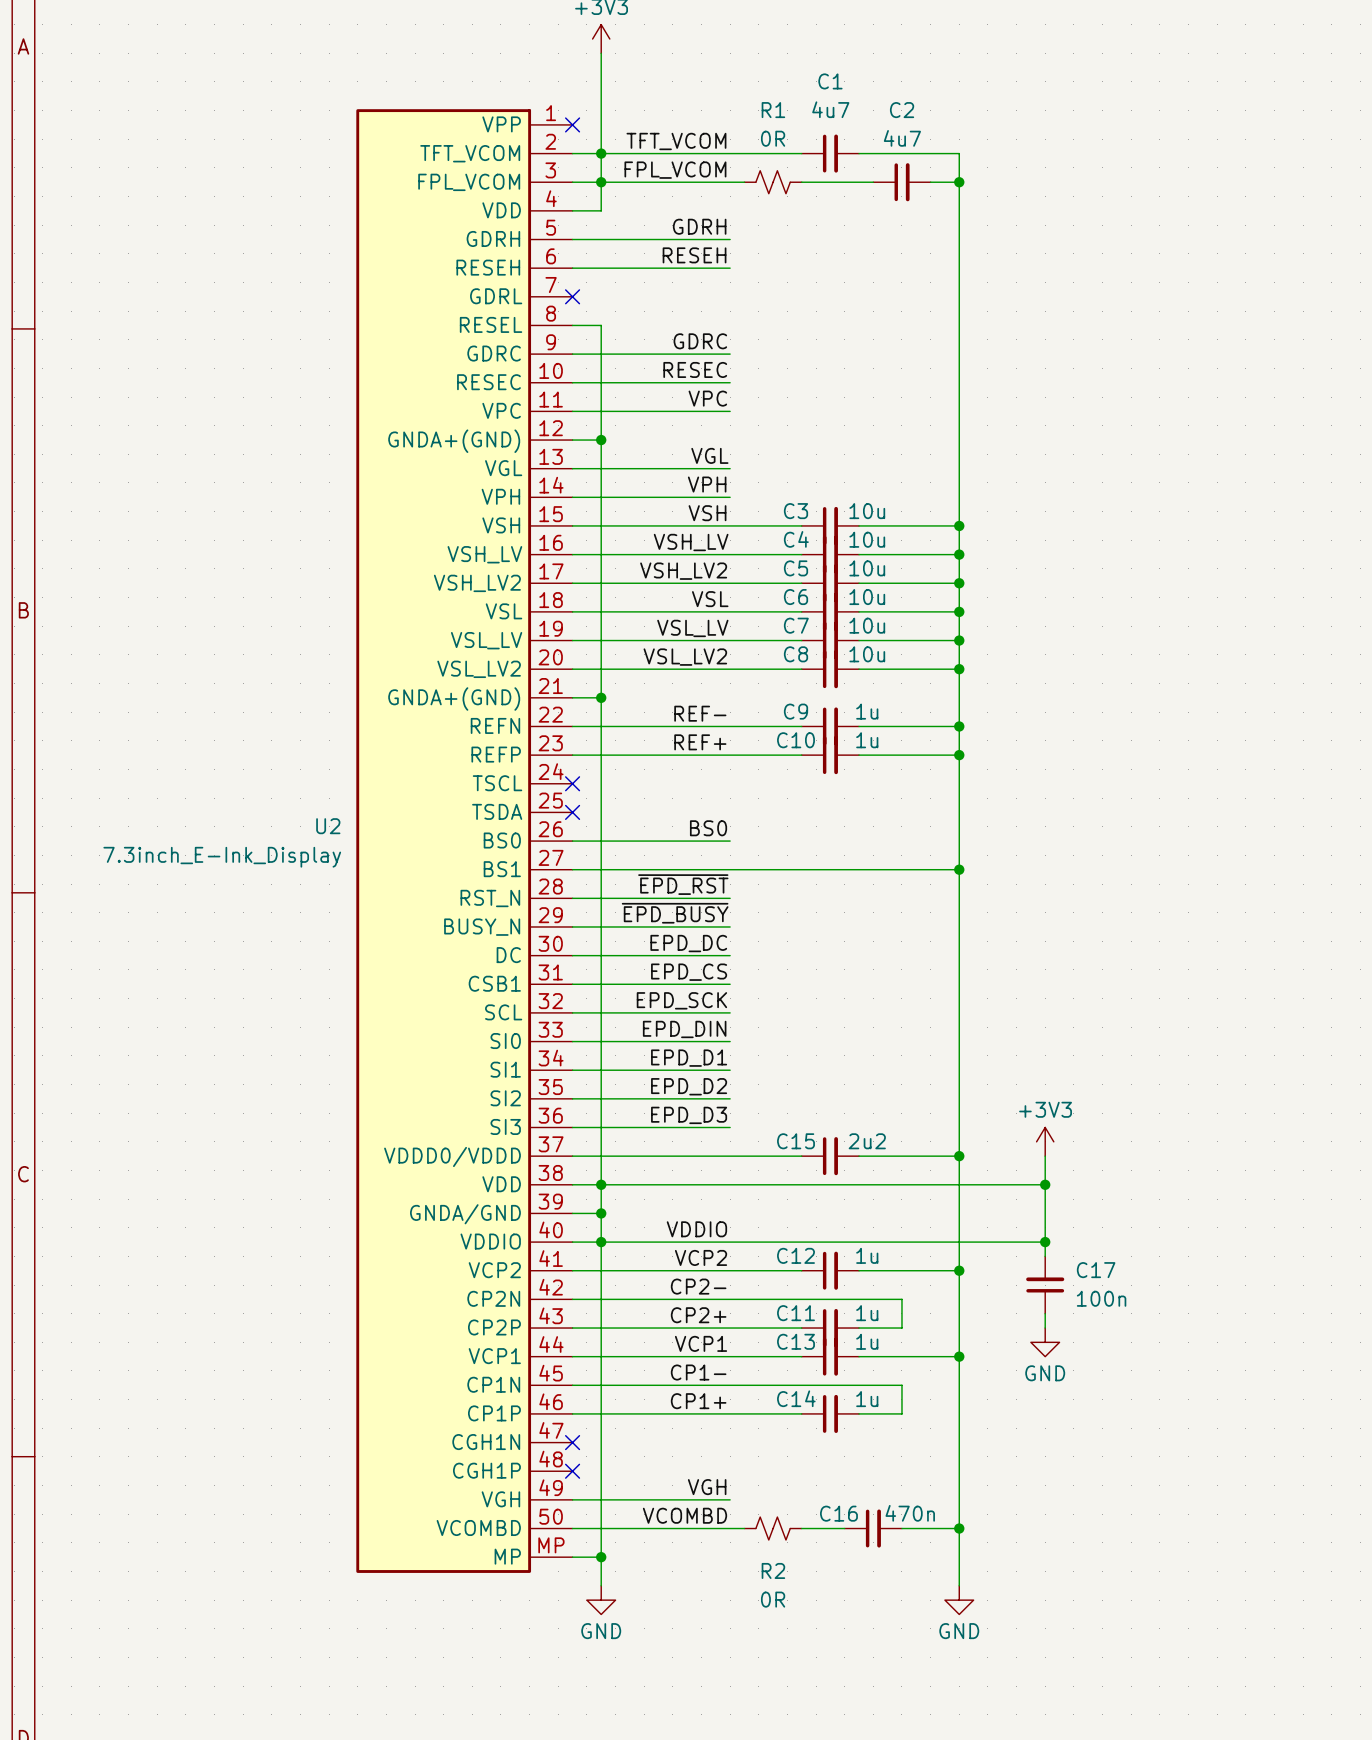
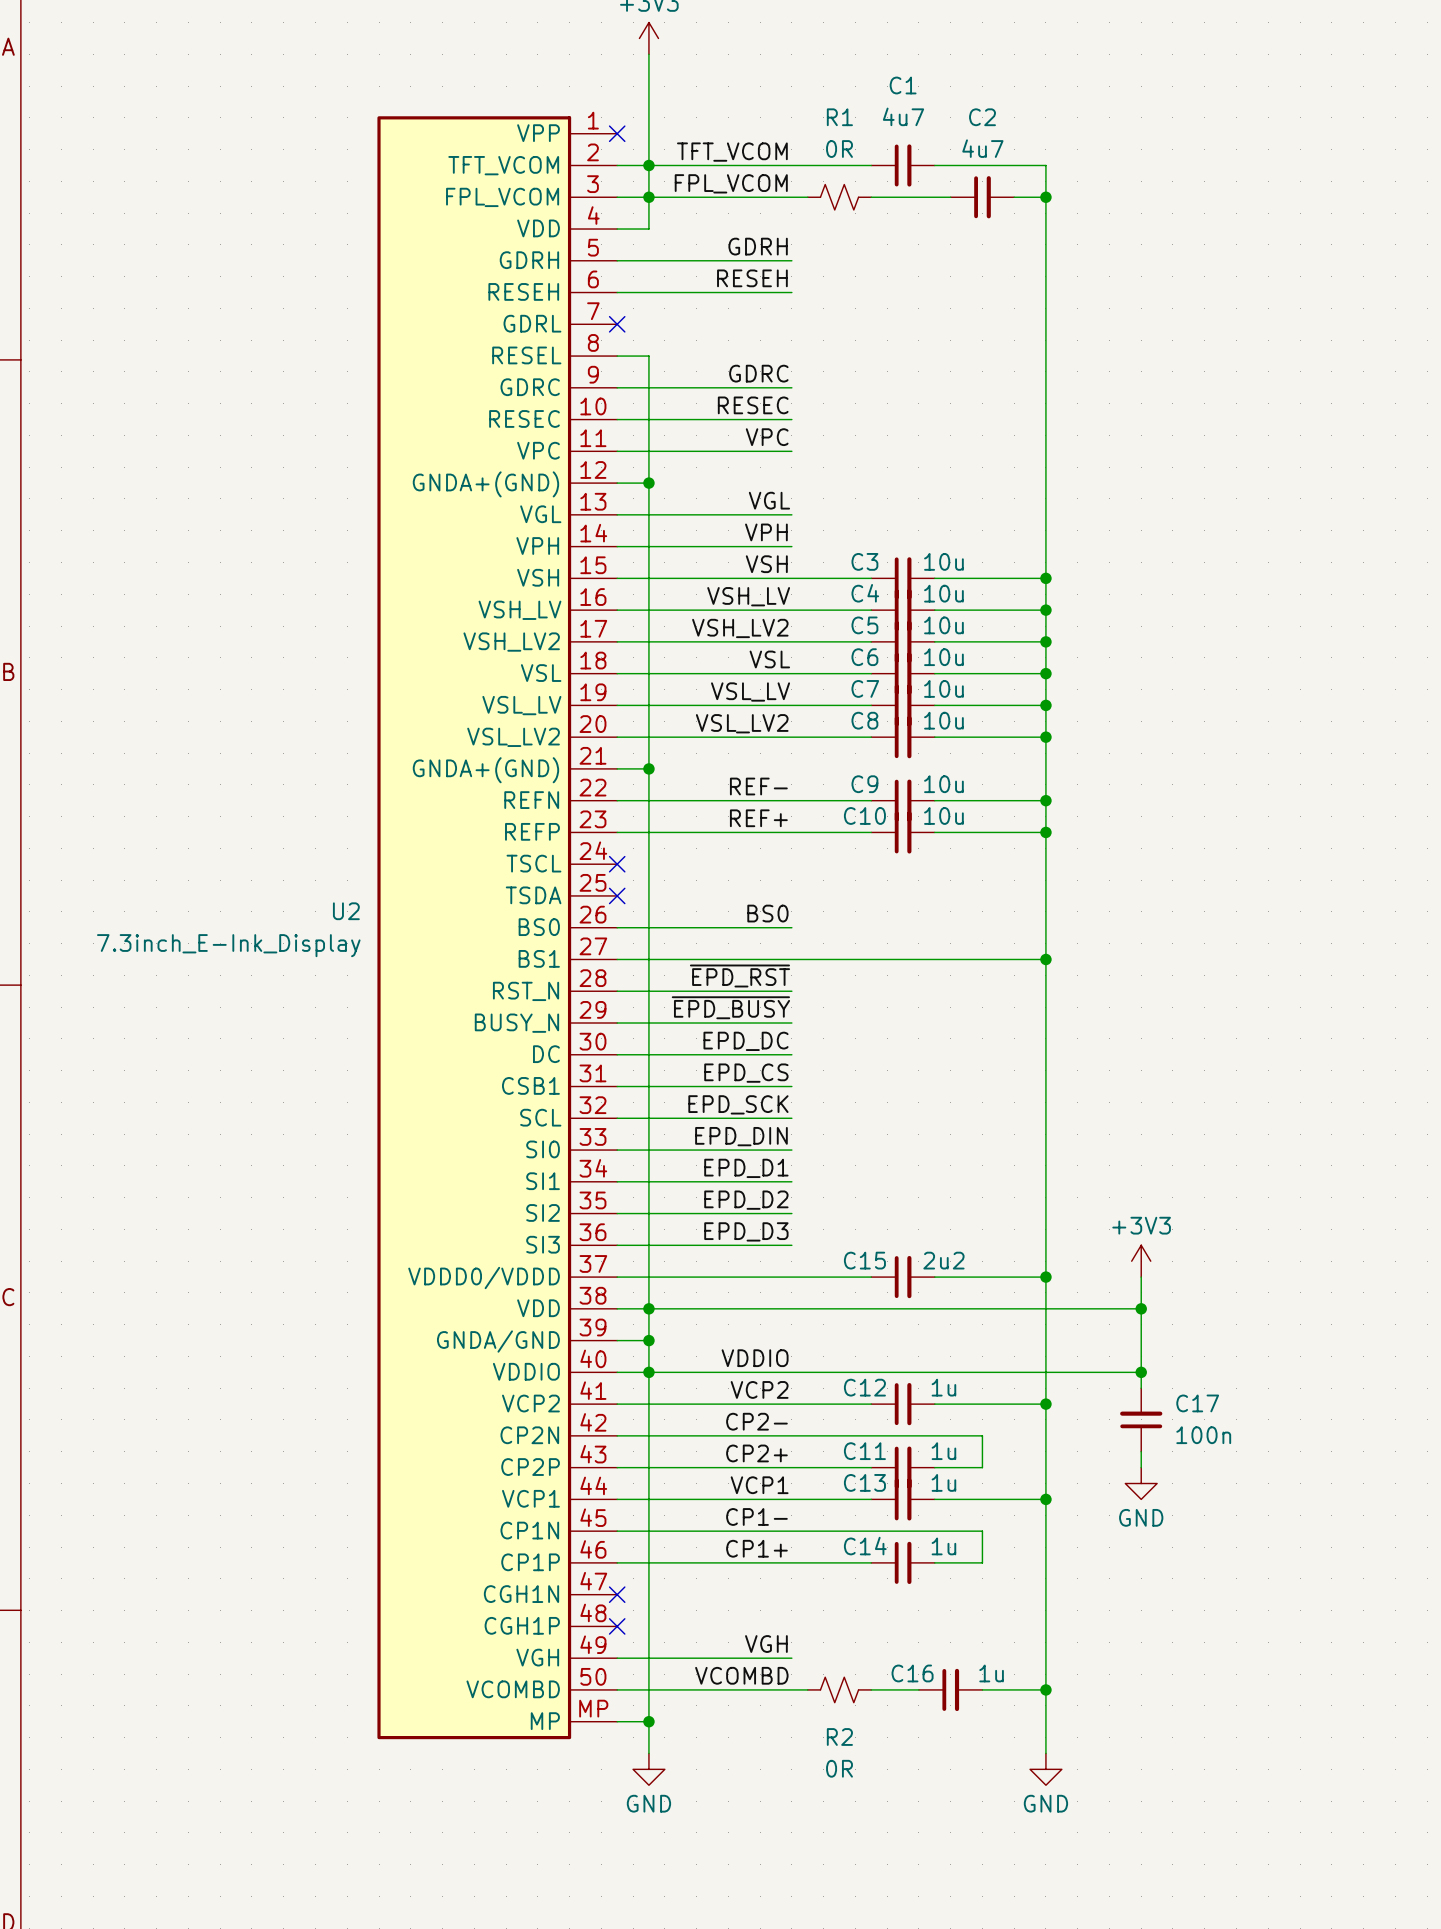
C9 value: 1u (867, 711) -> 10u (943, 784)
C10 value: 1u (867, 740) -> 10u (943, 815)
C16 value: 470n (910, 1513) -> 1u (991, 1673)

